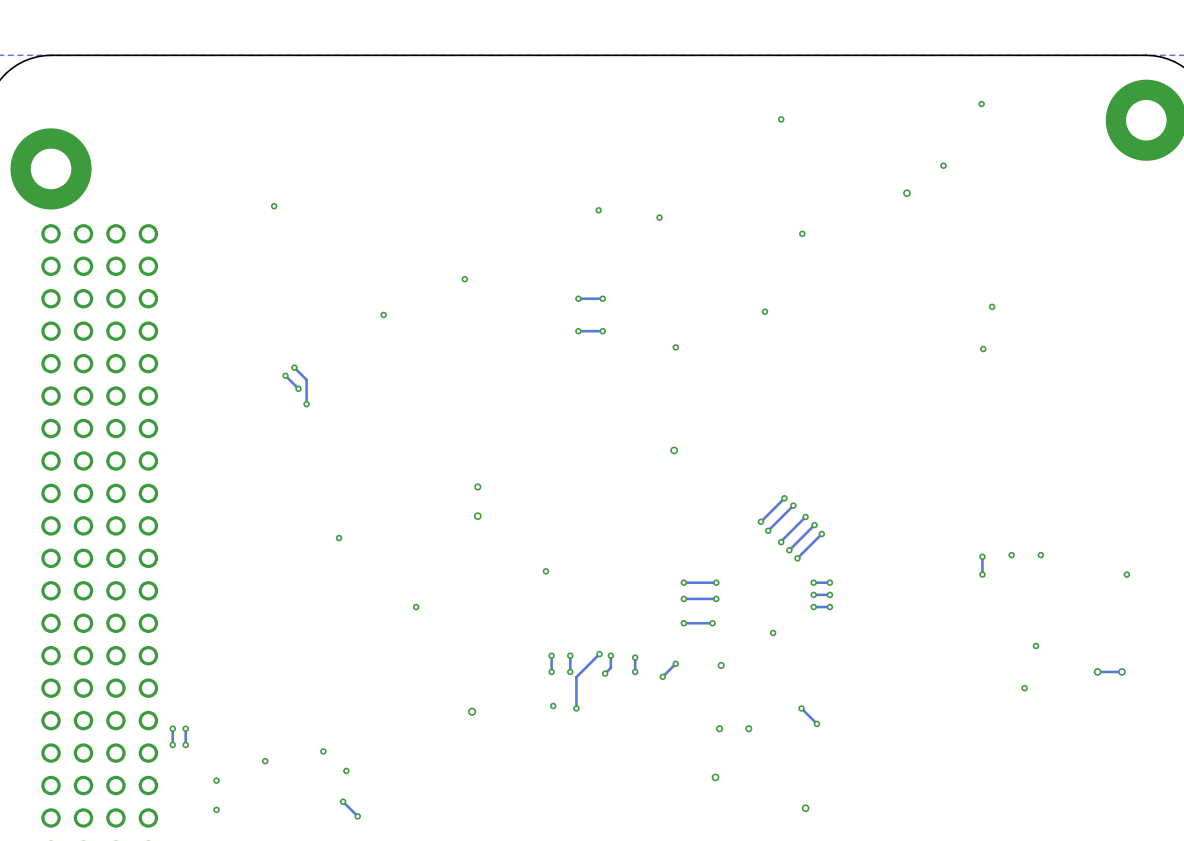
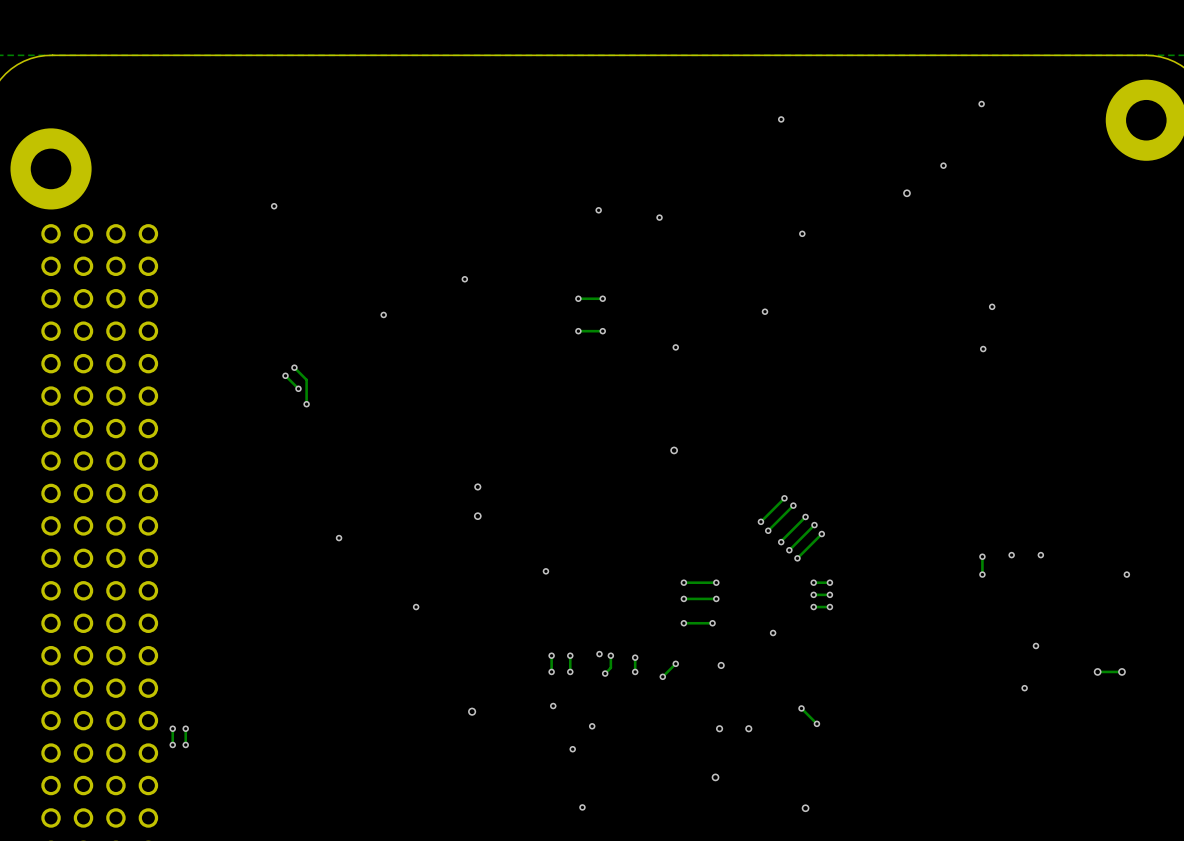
track: (599, 654) (576, 677) (576, 708) -> none
via: (576, 708) -> none
via: none -> (592, 726)
via: none -> (572, 749)
via: (323, 751) -> none
via: (265, 761) -> none
via: (346, 770) -> none
via: (216, 780) -> none
track: (343, 801) (357, 816) -> none
via: (343, 801) -> none
via: none -> (582, 807)
via: (216, 809) -> none
via: (357, 816) -> none

